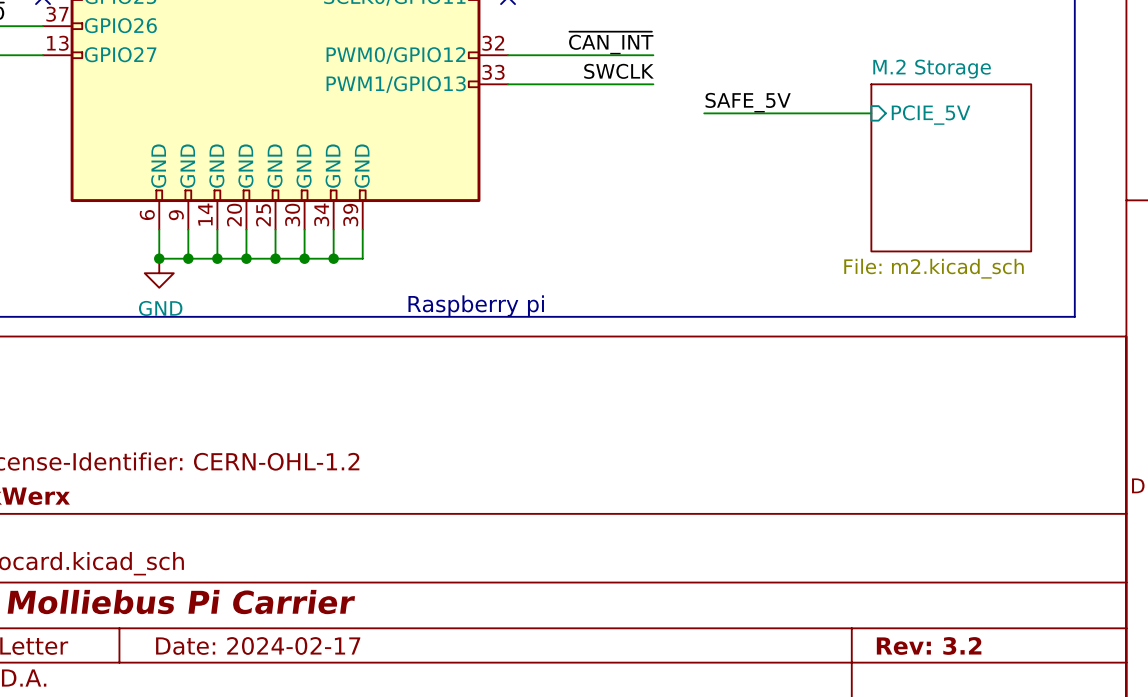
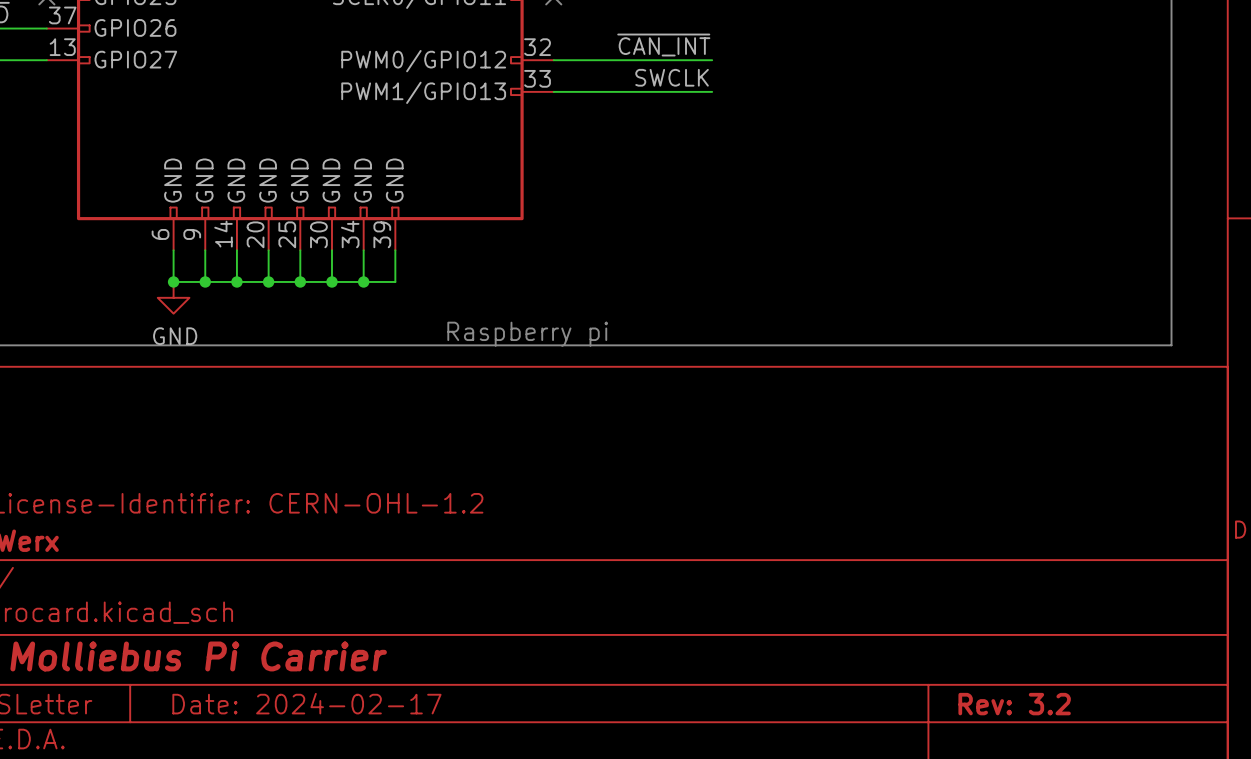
label: SAFE_5V (748, 102) -> none
wire: (704, 113) (871, 113) -> none
sheet pin: PCIE_5V (931, 115) -> none
sheet M.2 Storage: File: m2.kicad_sch (951, 167) -> none

